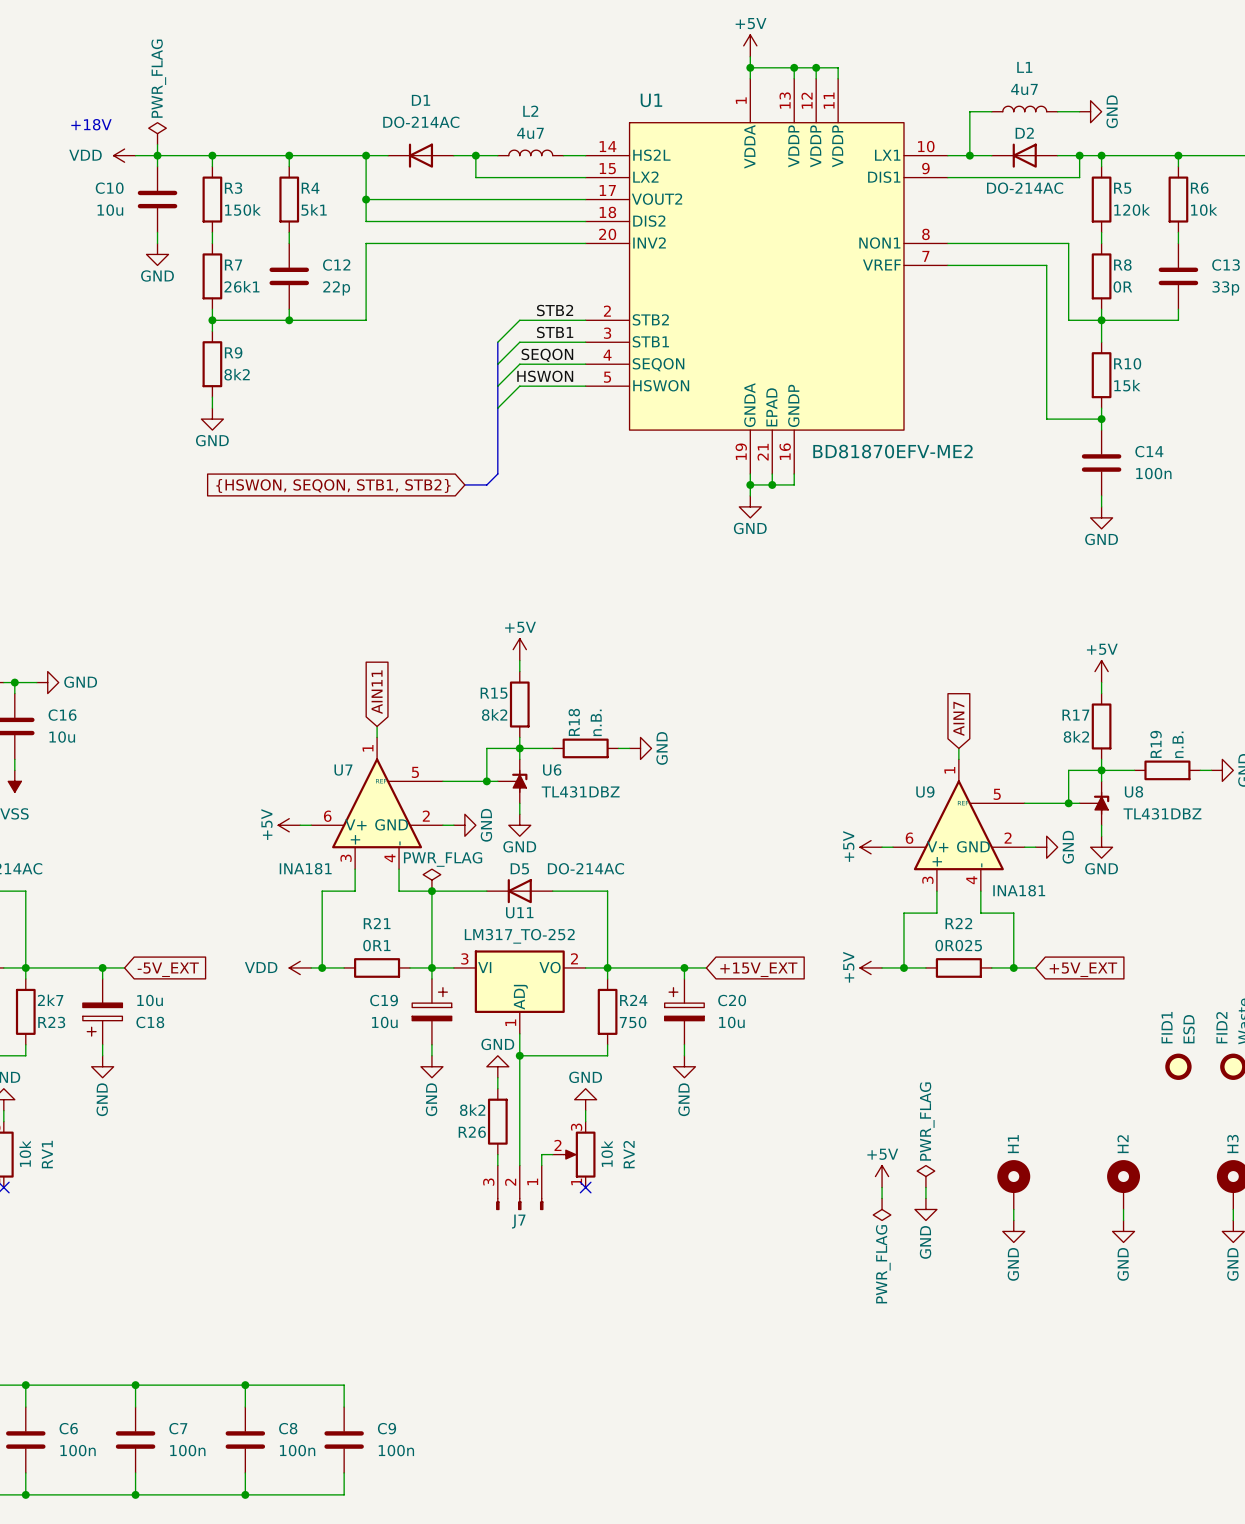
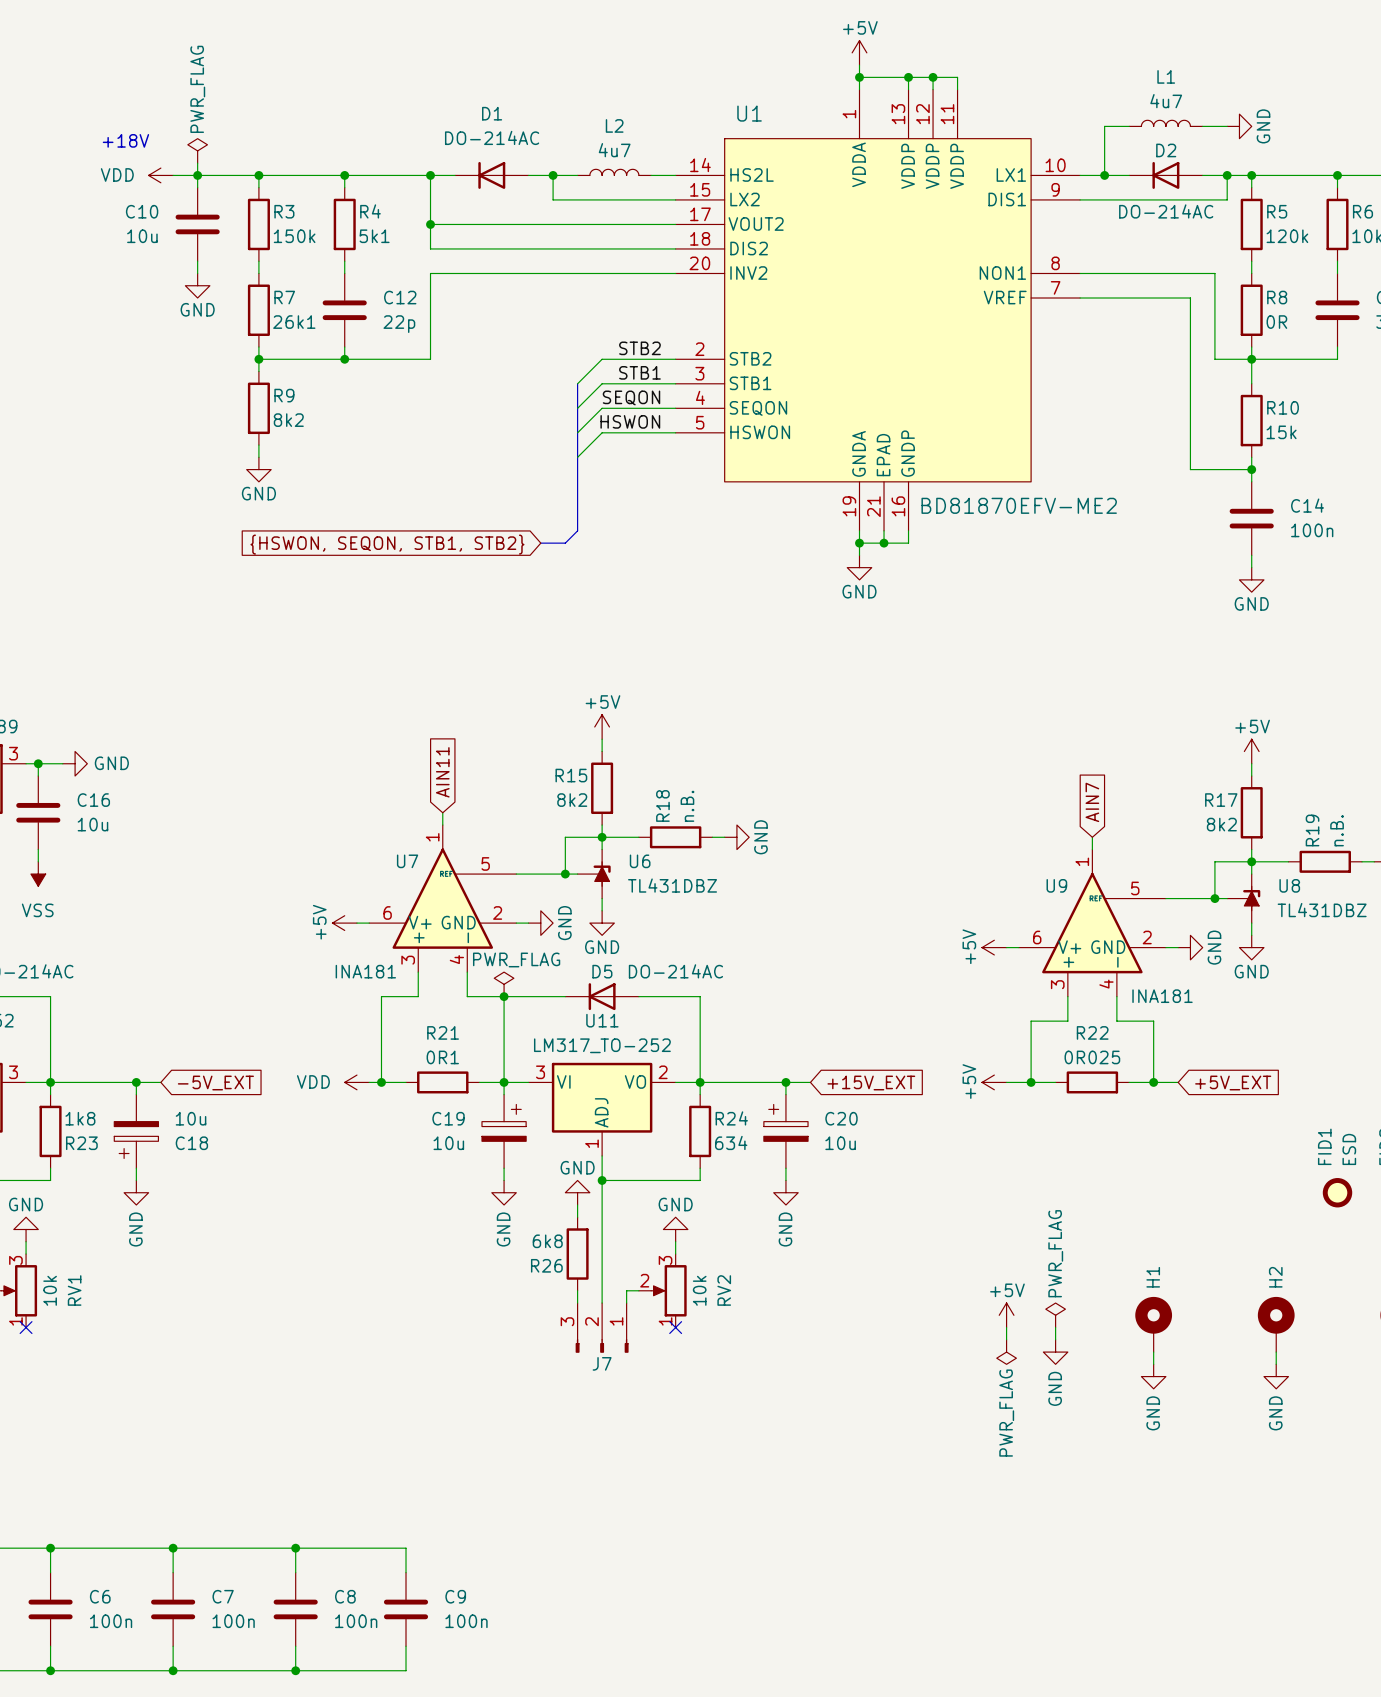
R23 value: 2k7 (50, 1000) -> 1k8 (80, 1118)
R24 value: 750 (633, 1022) -> 634 (731, 1142)
R26 value: 8k2 (472, 1110) -> 6k8 (547, 1241)

